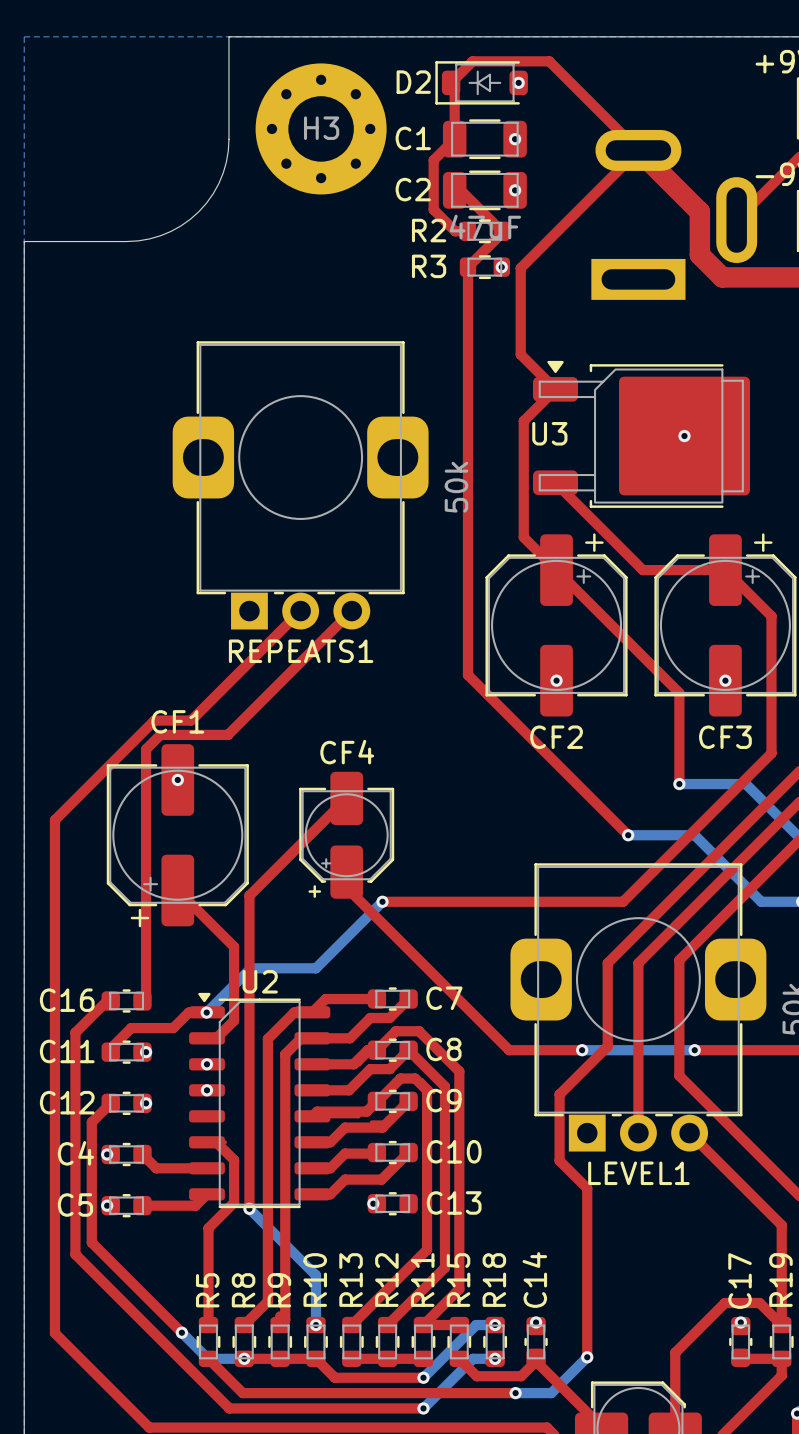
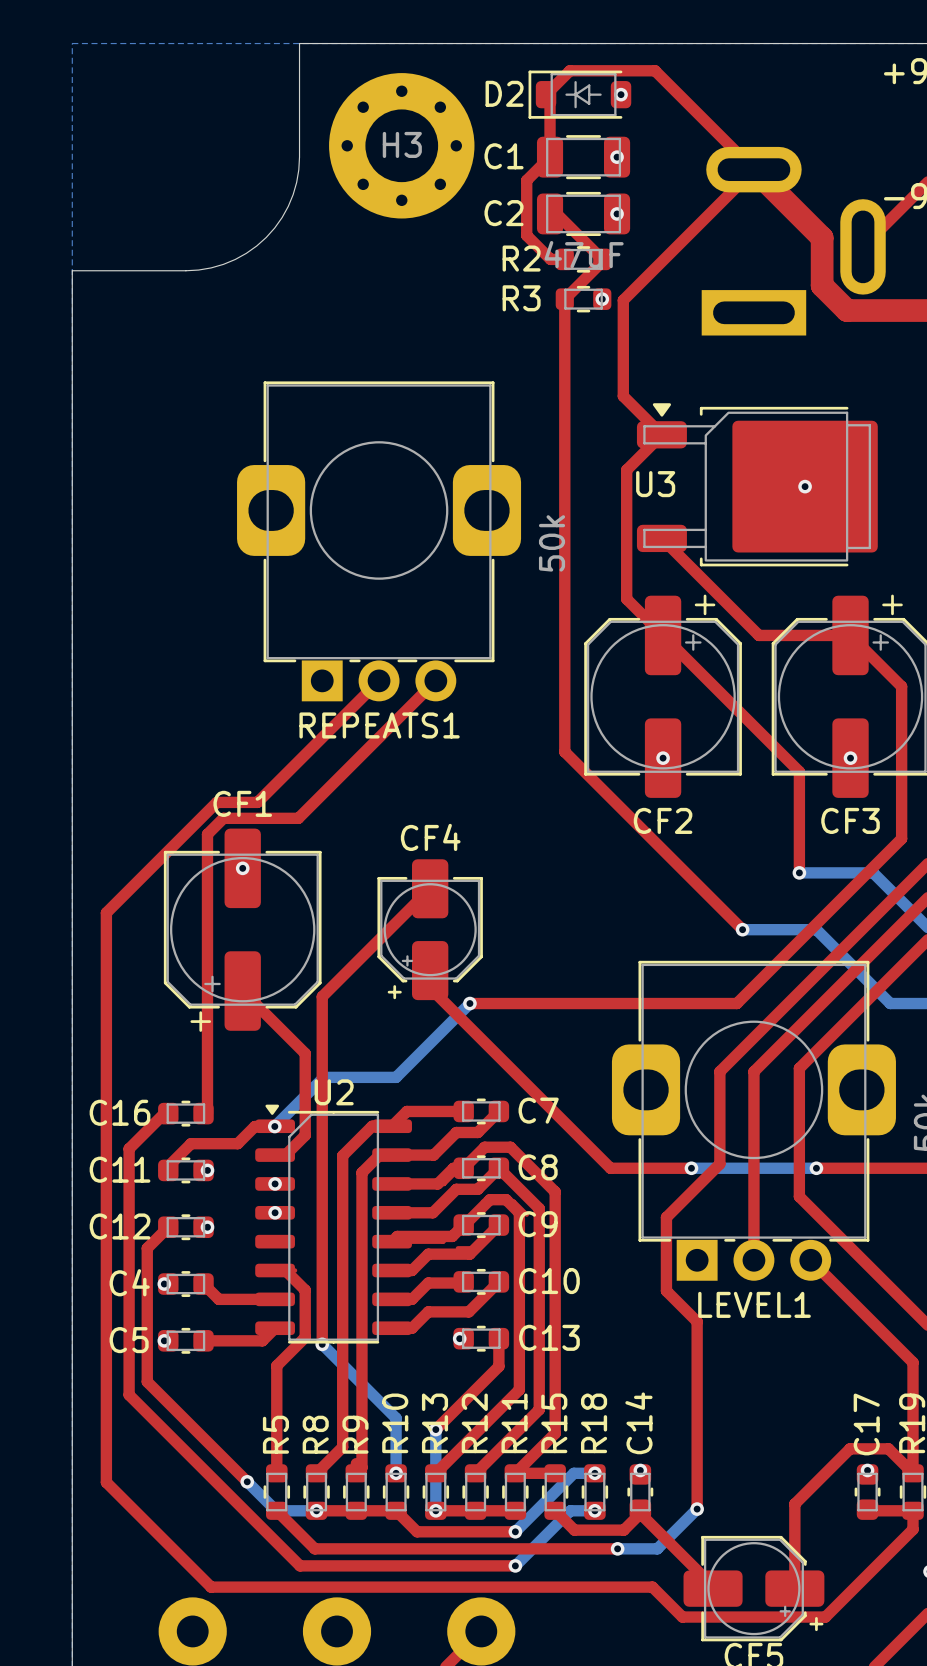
top track: none -> (498, 1338) (498, 1366) (435, 1429)
bottom track: none -> (435, 1429) (435, 1510)
via: none -> (435, 1429)
via: none -> (435, 1510)

